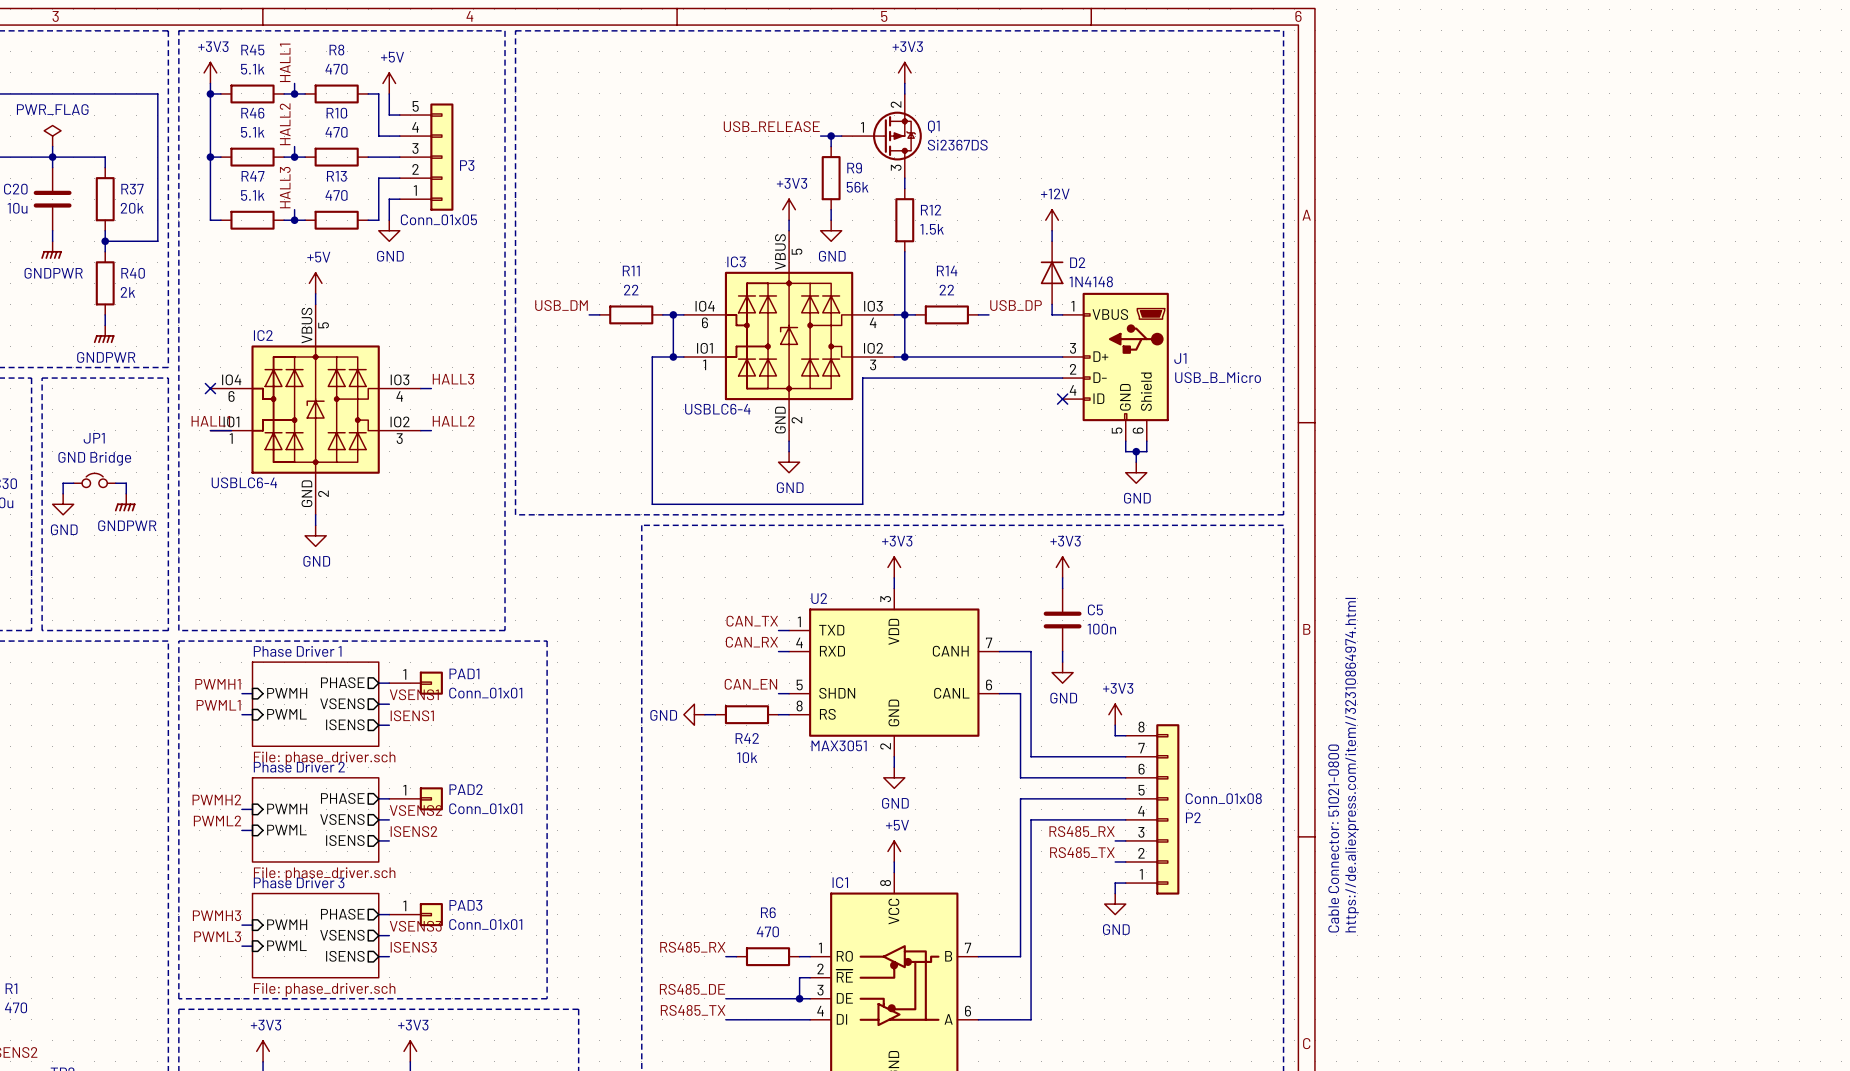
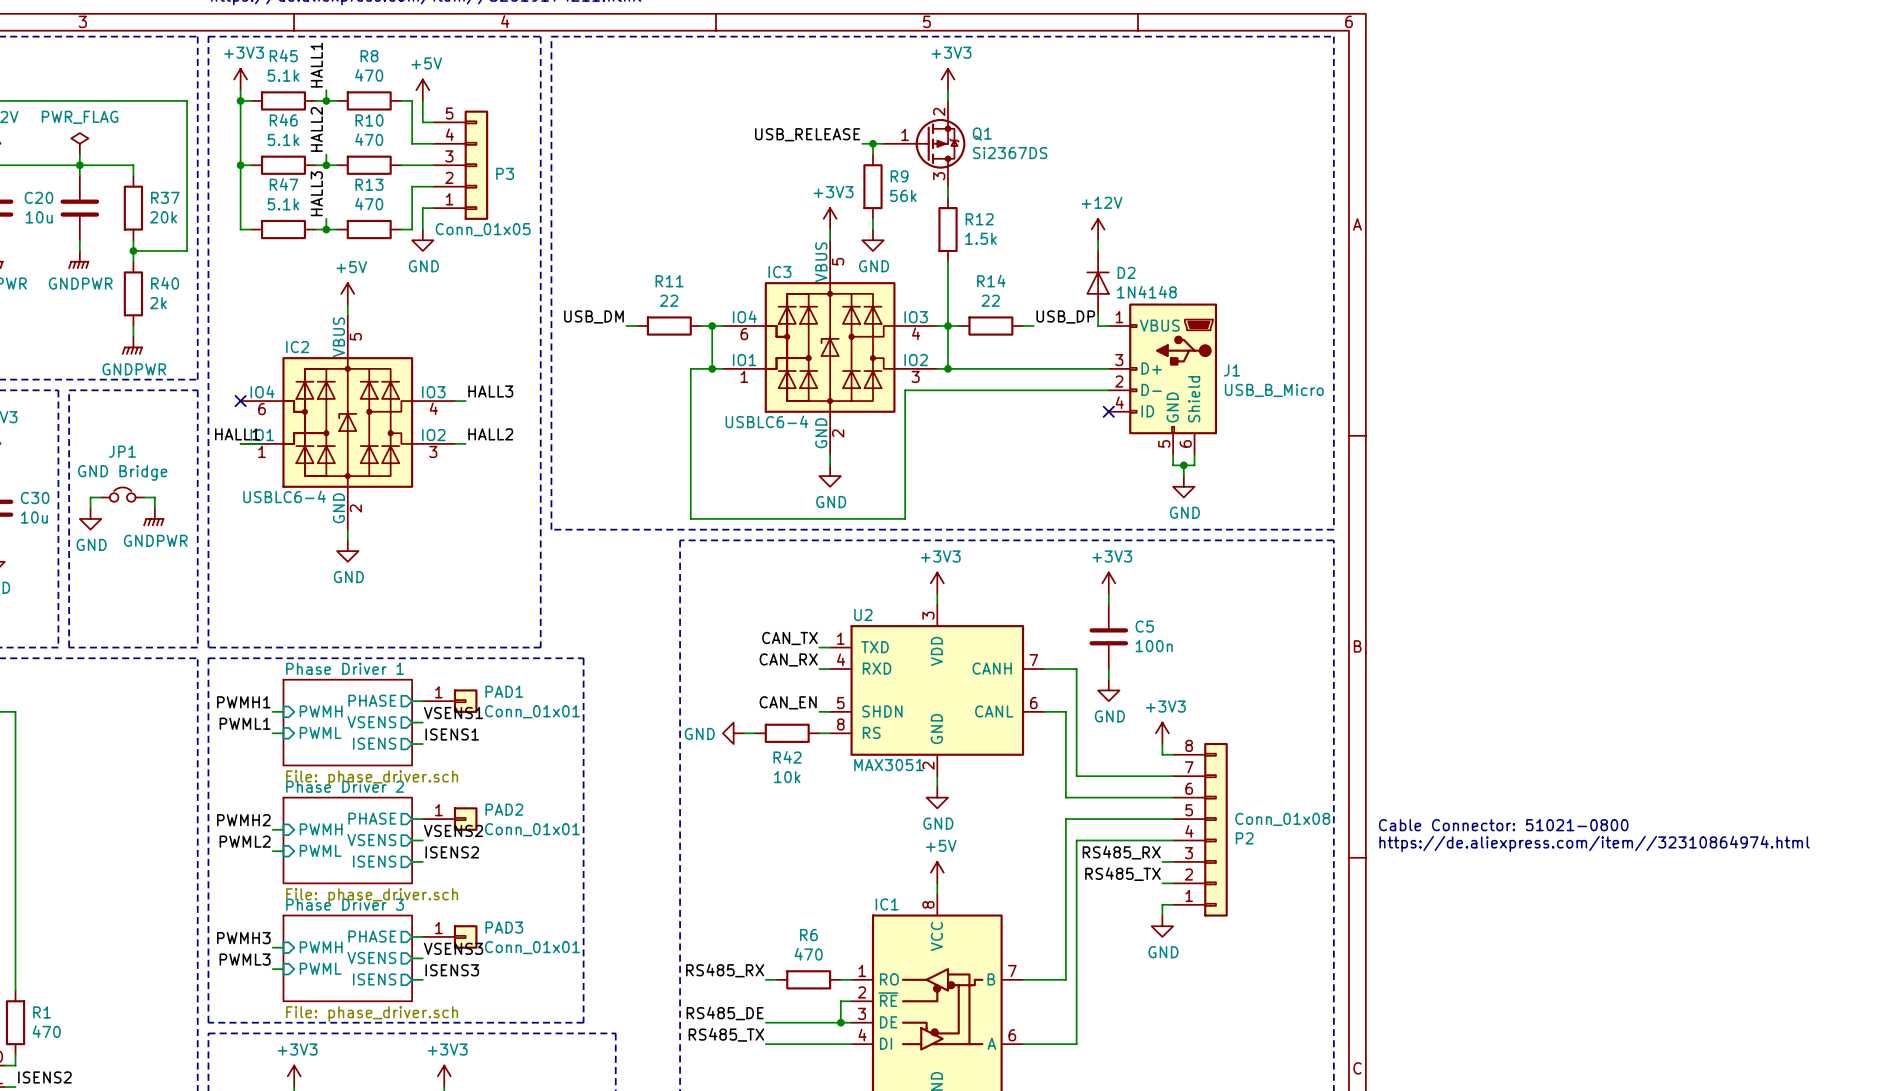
text rotation: 0° (1352, 765) -> 90° clockwise (1594, 843)
text rotation: 0° (1333, 838) -> 90° clockwise (1503, 825)

